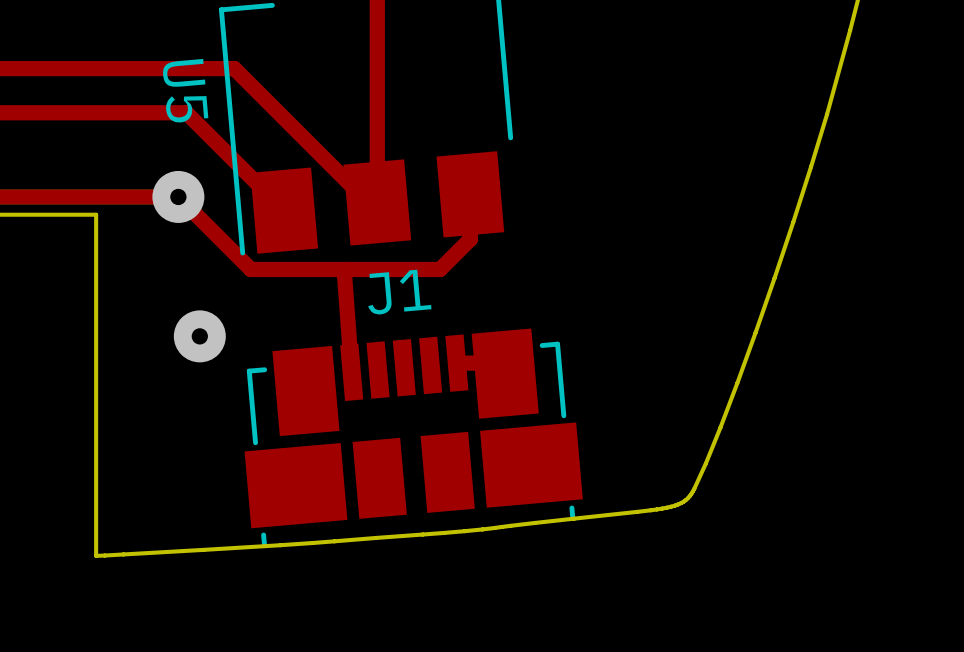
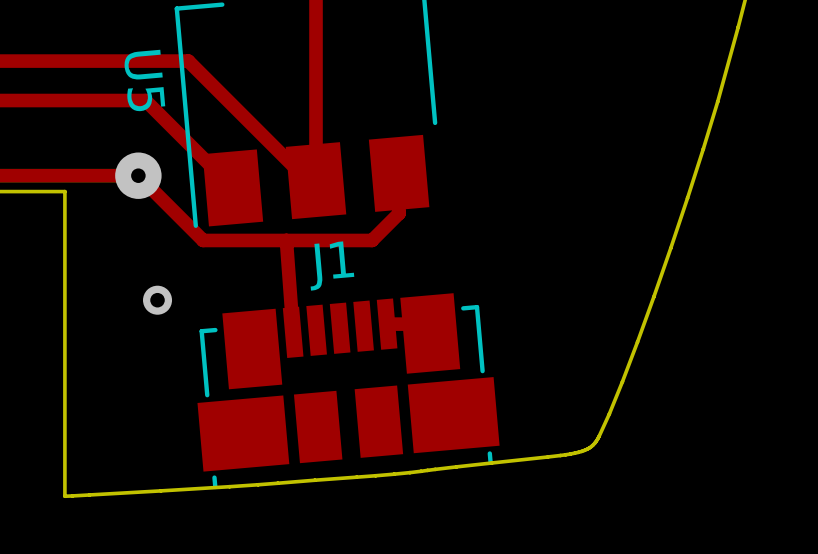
via size: [173, 310, 226, 363] -> [143, 285, 173, 315]

